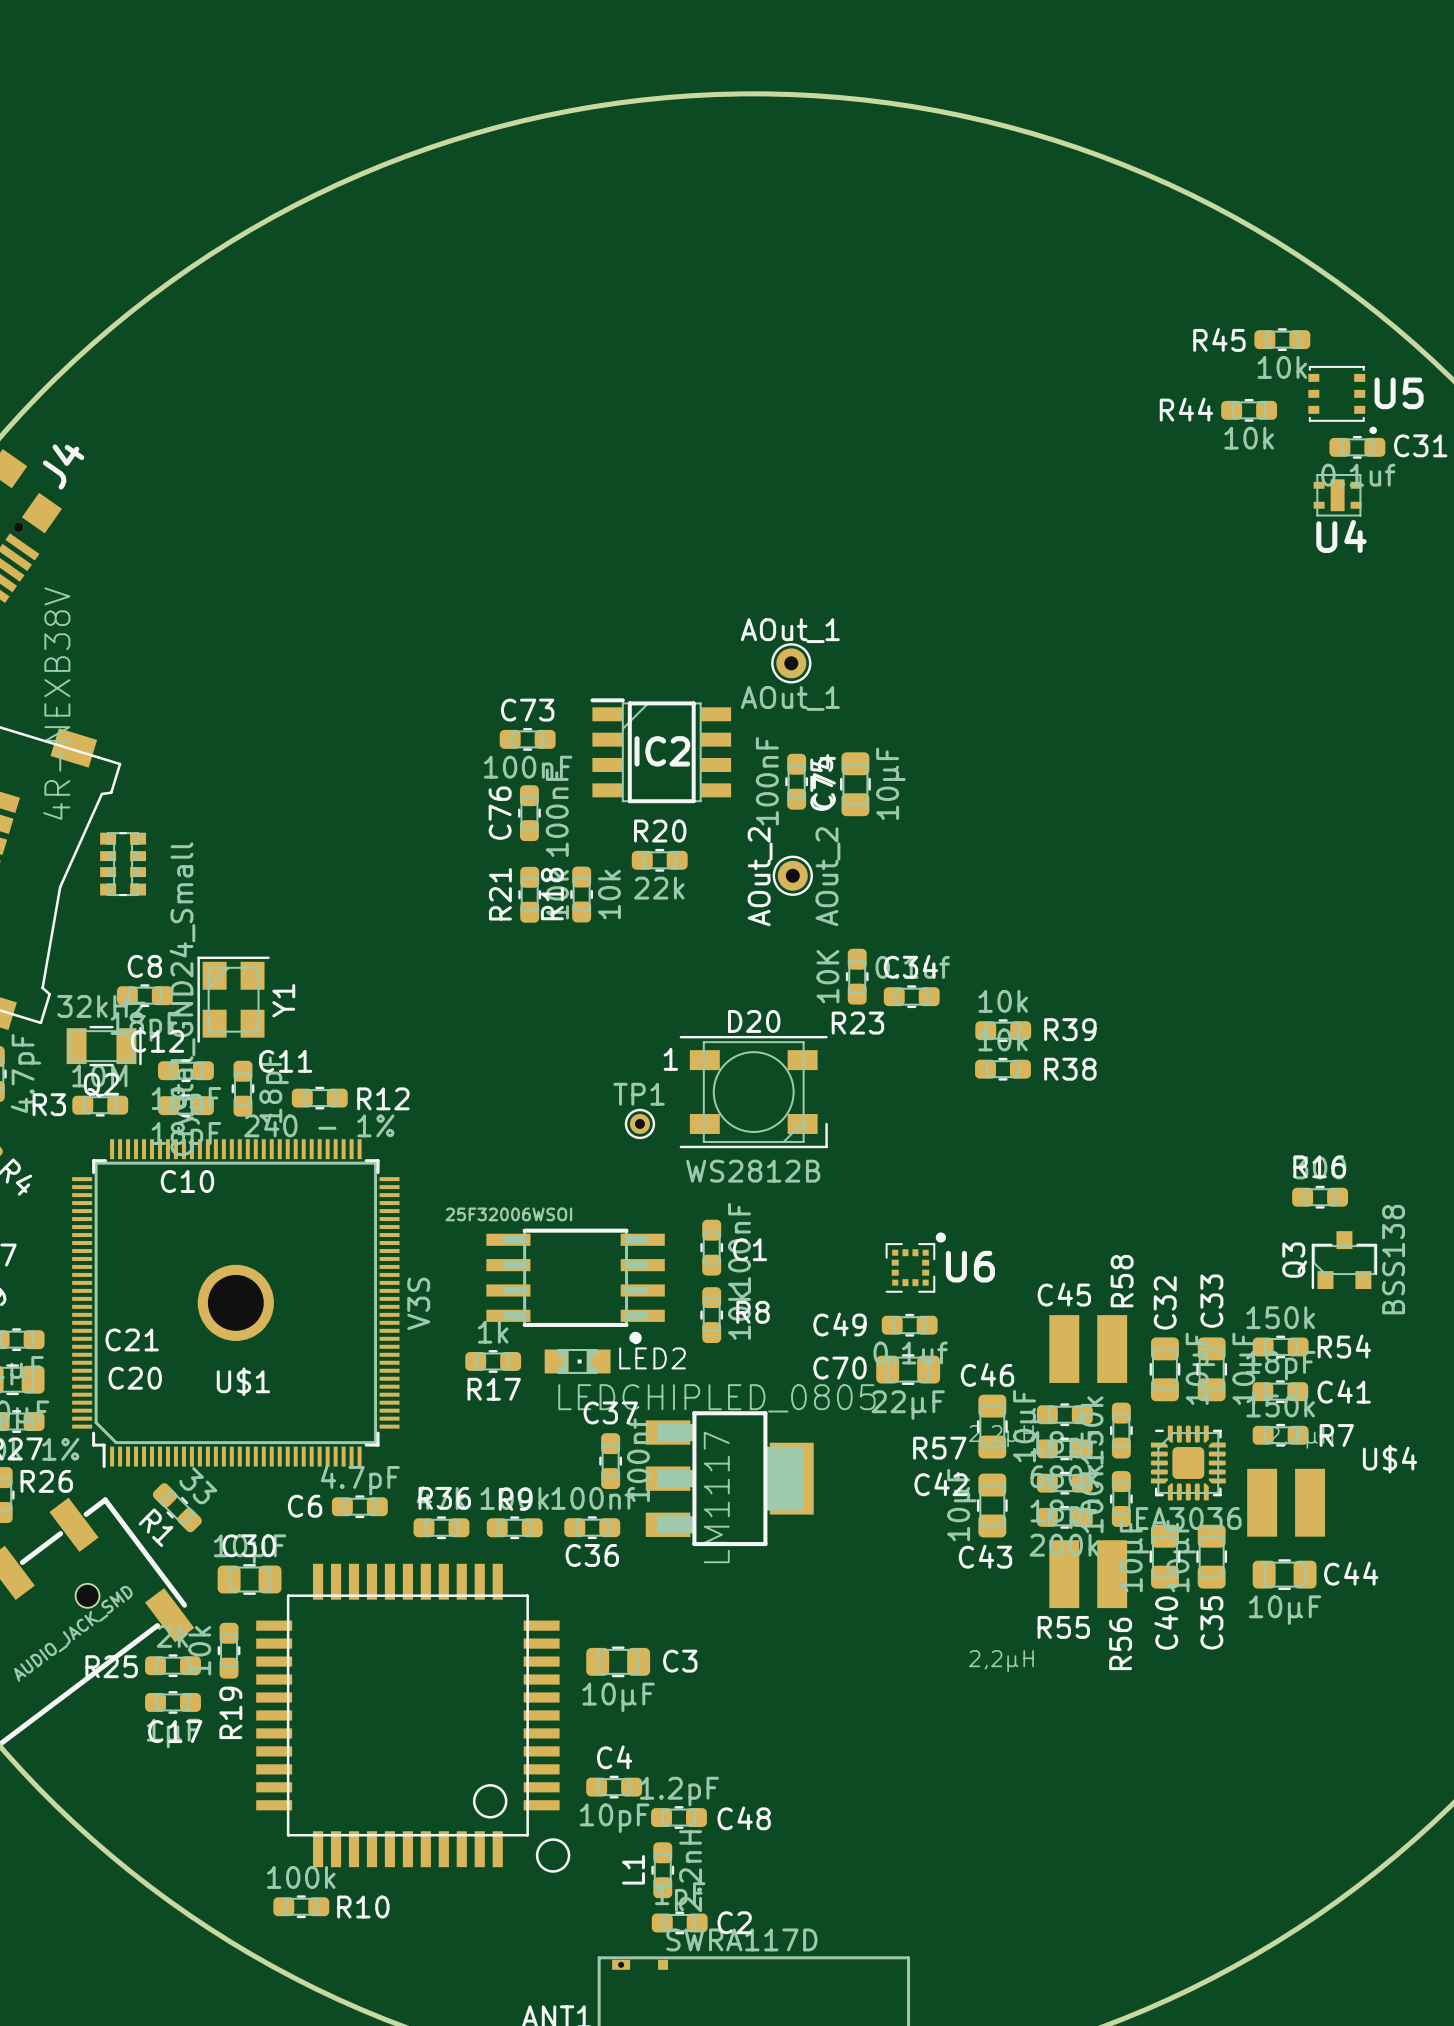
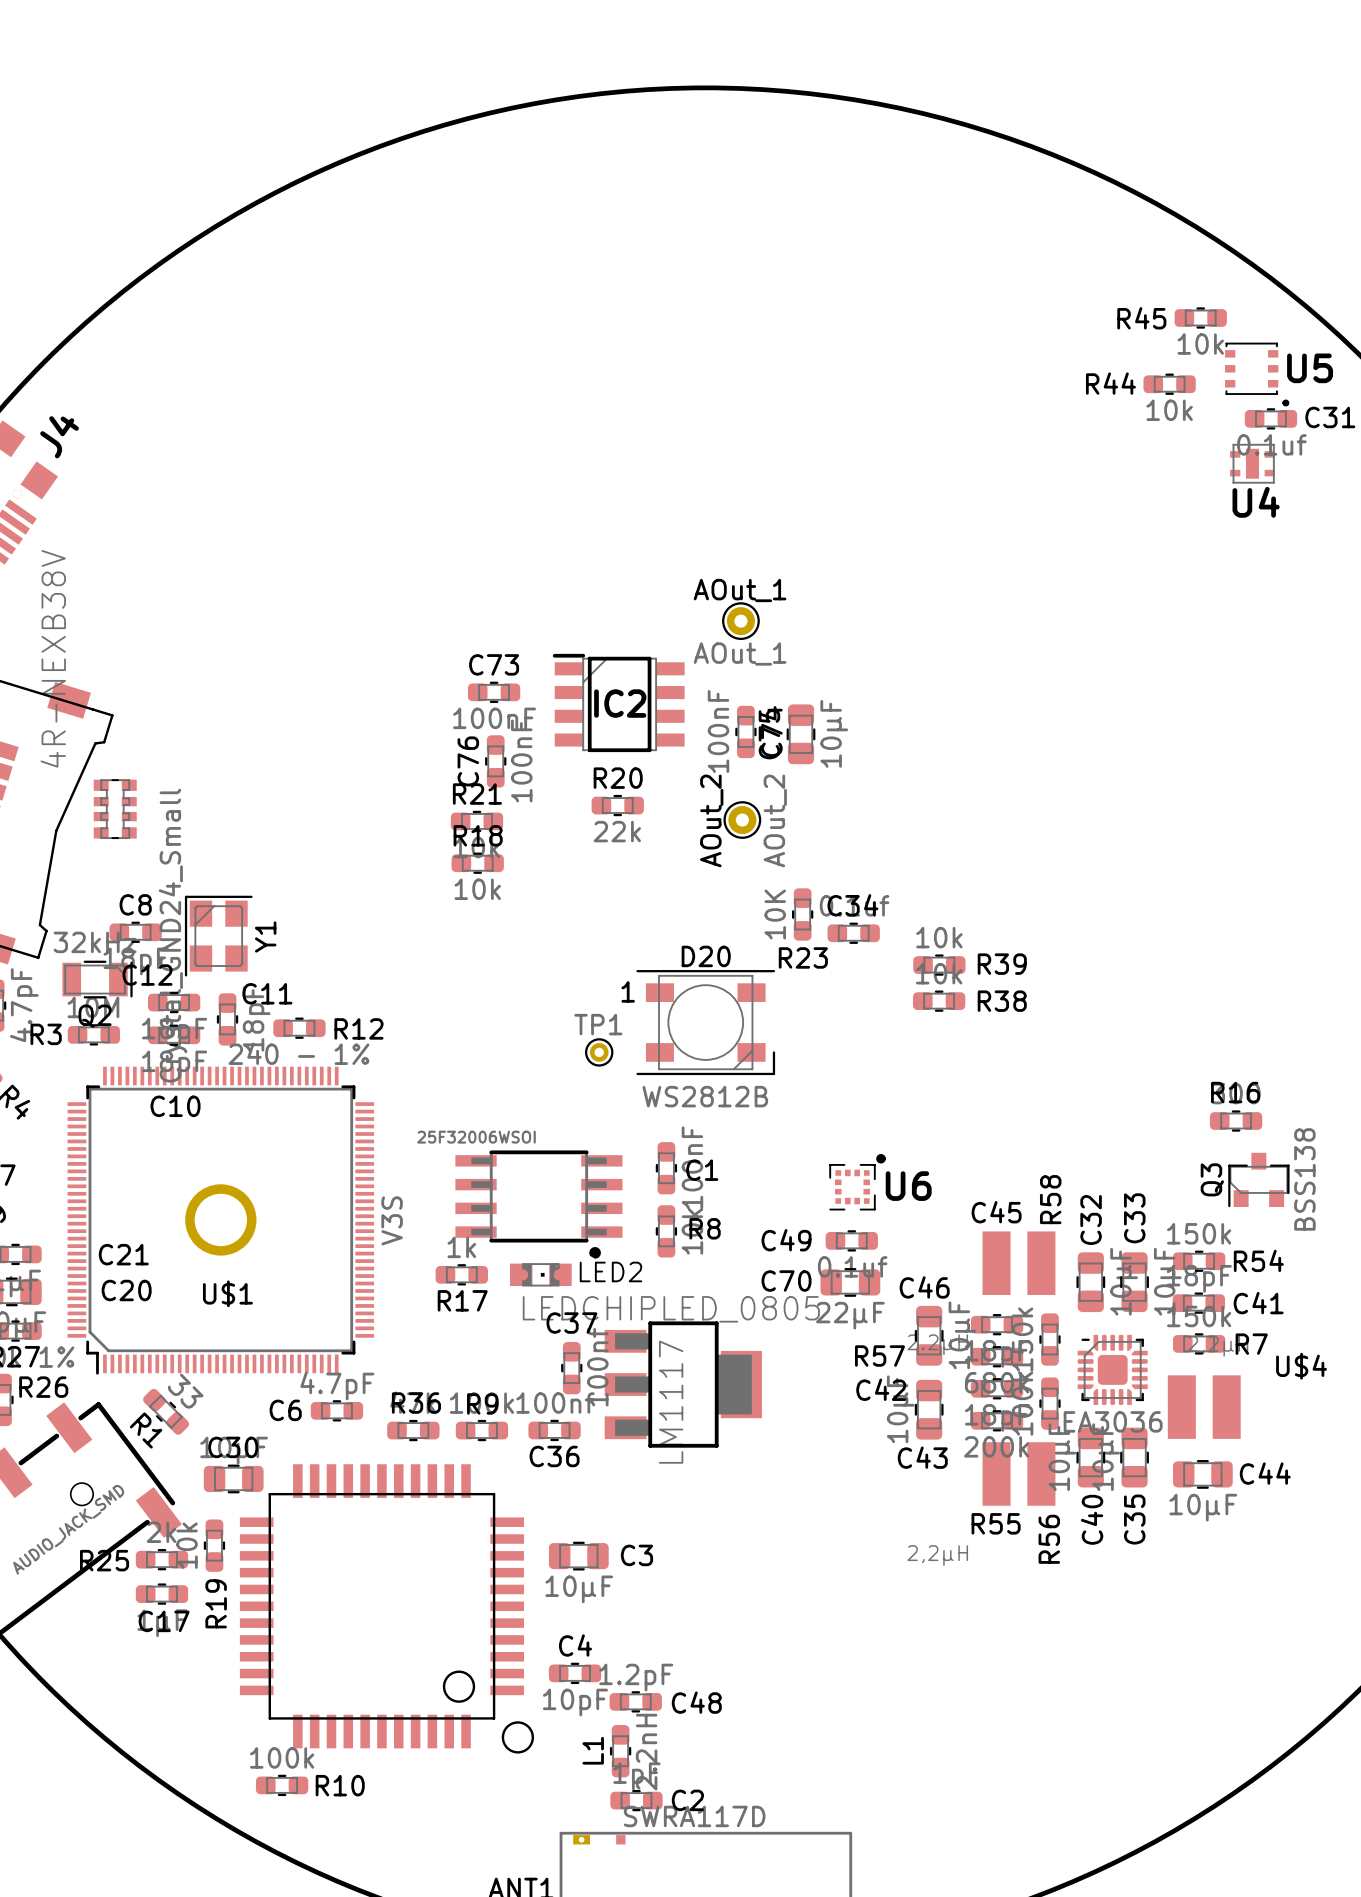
R21 rotation: 0° (529, 894) -> 90° clockwise (476, 821)
R18 rotation: 0° (581, 894) -> 90° clockwise (477, 863)
R18 position: (581, 894) -> (477, 863)

